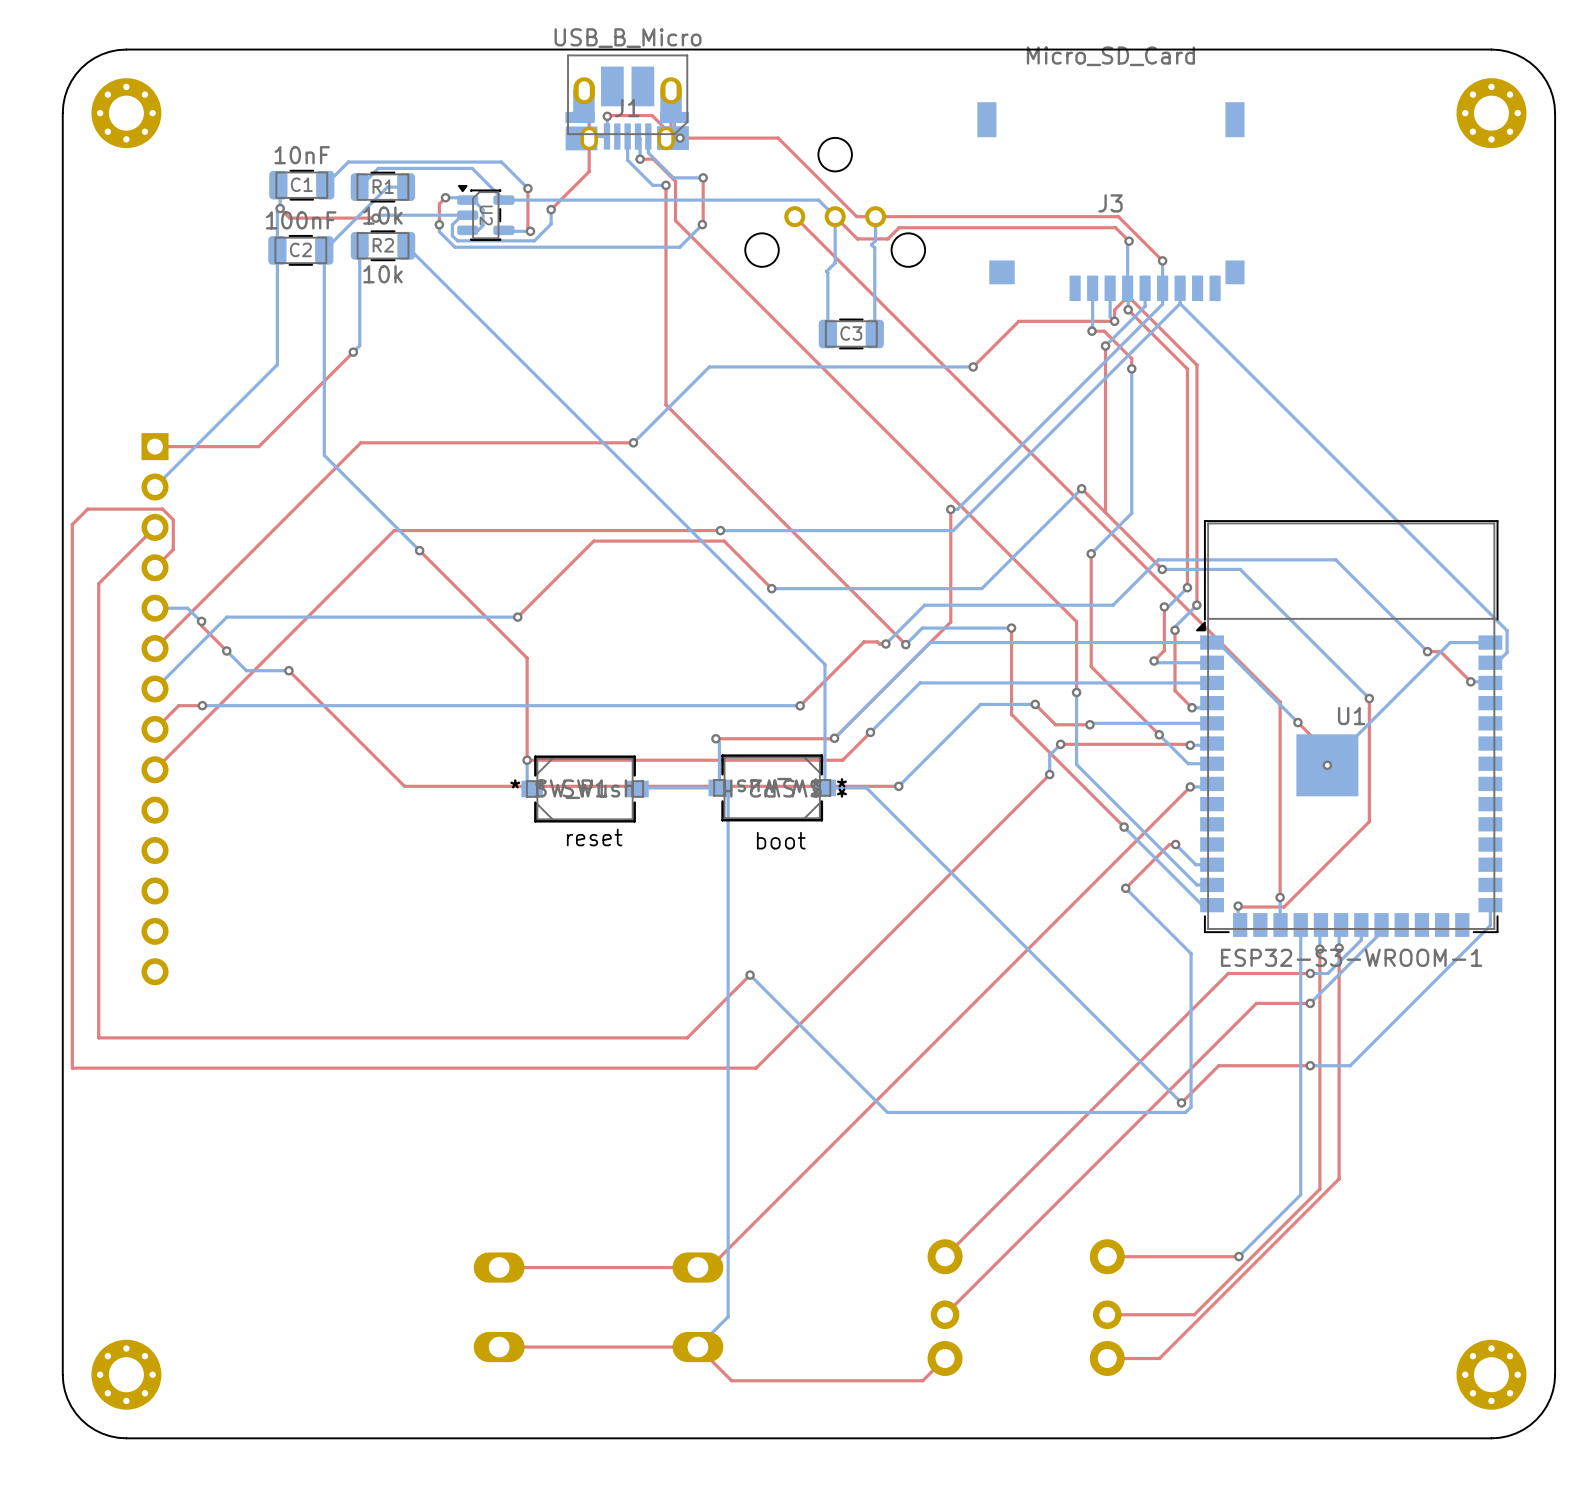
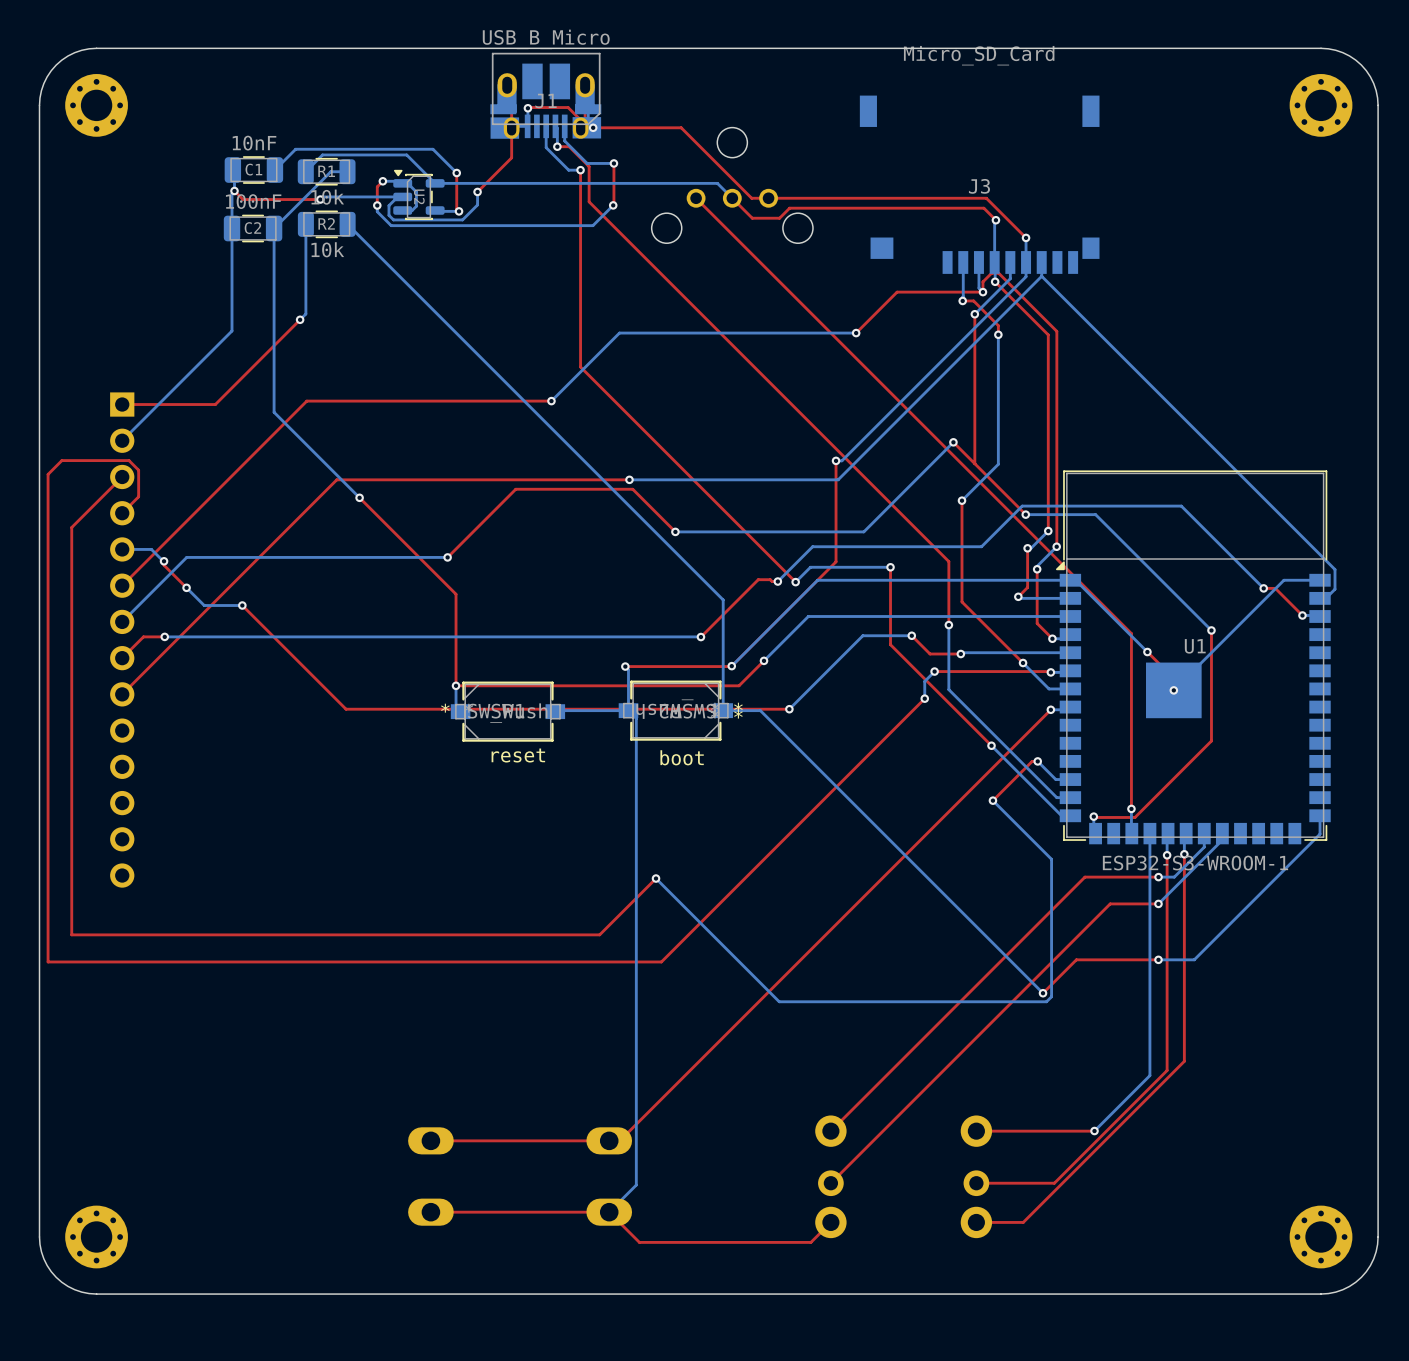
bottom track: (835, 216) (835, 262) (826, 271) (827, 333) -> none
bottom track: (875, 216) (875, 240) (871, 244) (874, 247) (874, 333) -> none
C3: (851, 333) -> none

